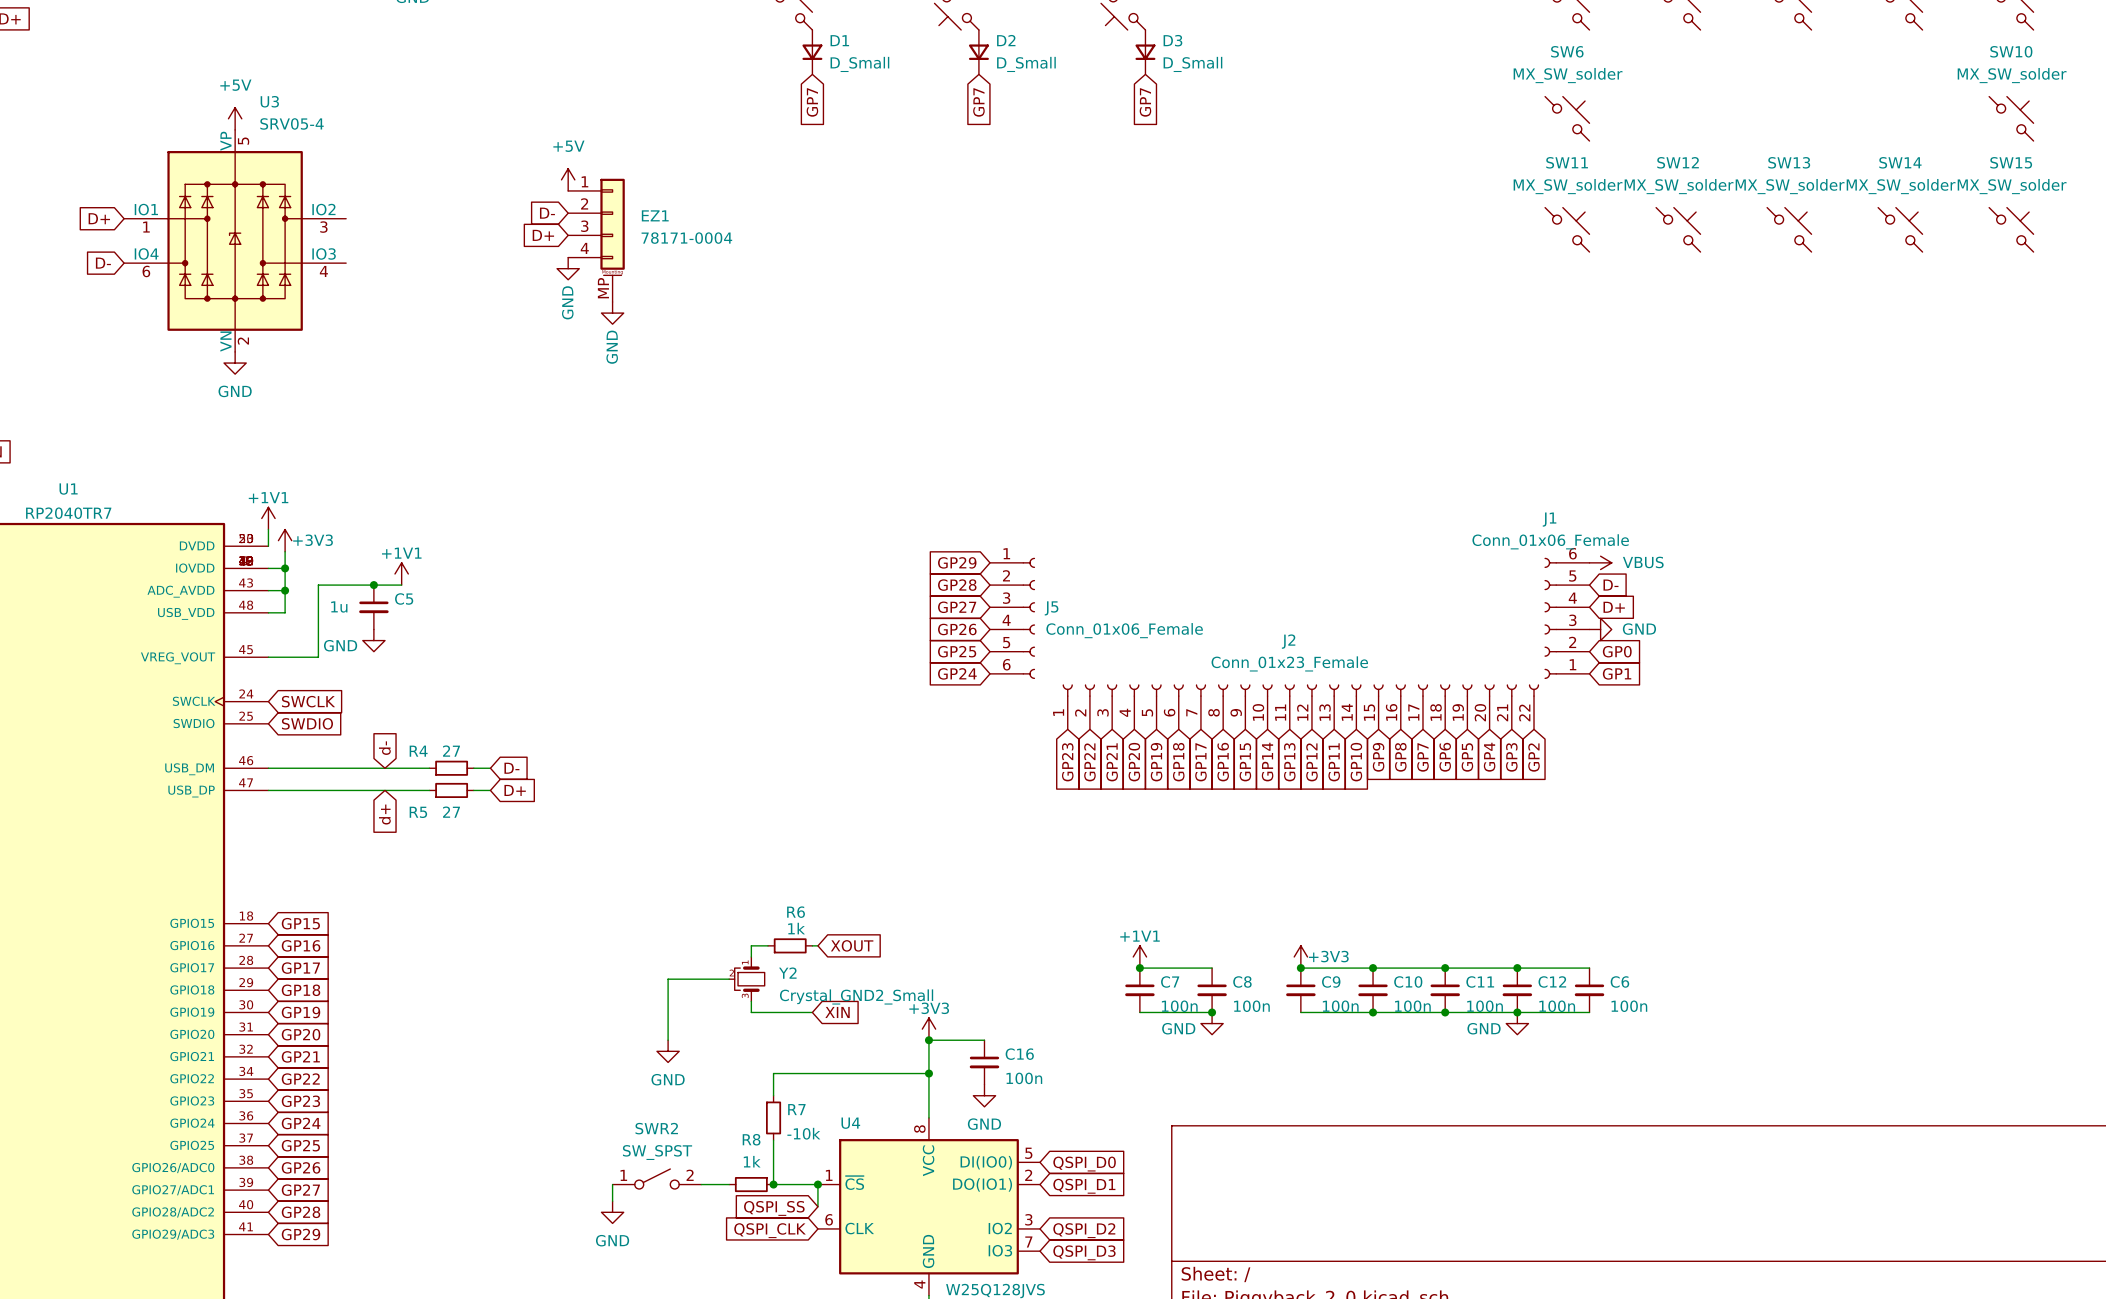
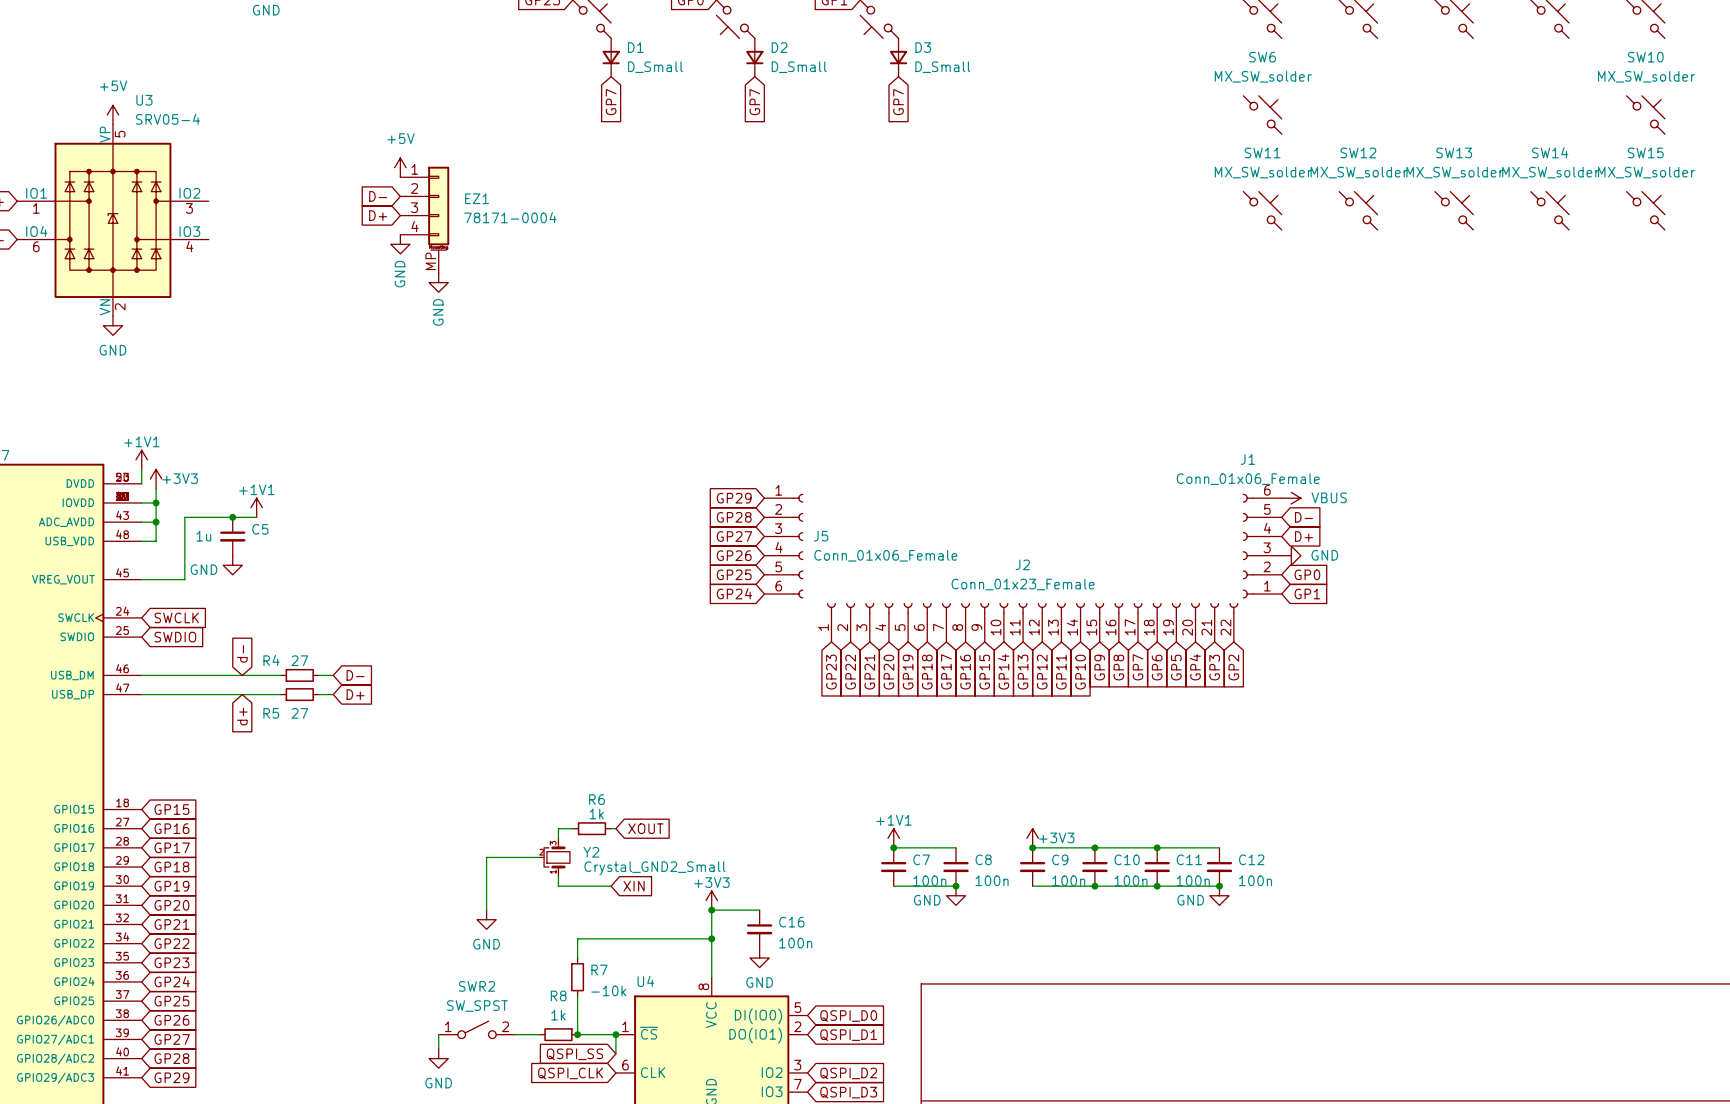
wire: (1517, 968) (1589, 968) -> none
junction: (1517, 968) -> none
Y2 flip: as is (749, 979) -> up-down (557, 857)
C6: 100n (1589, 990) -> none
wire: (1517, 1012) (1589, 1012) -> none

